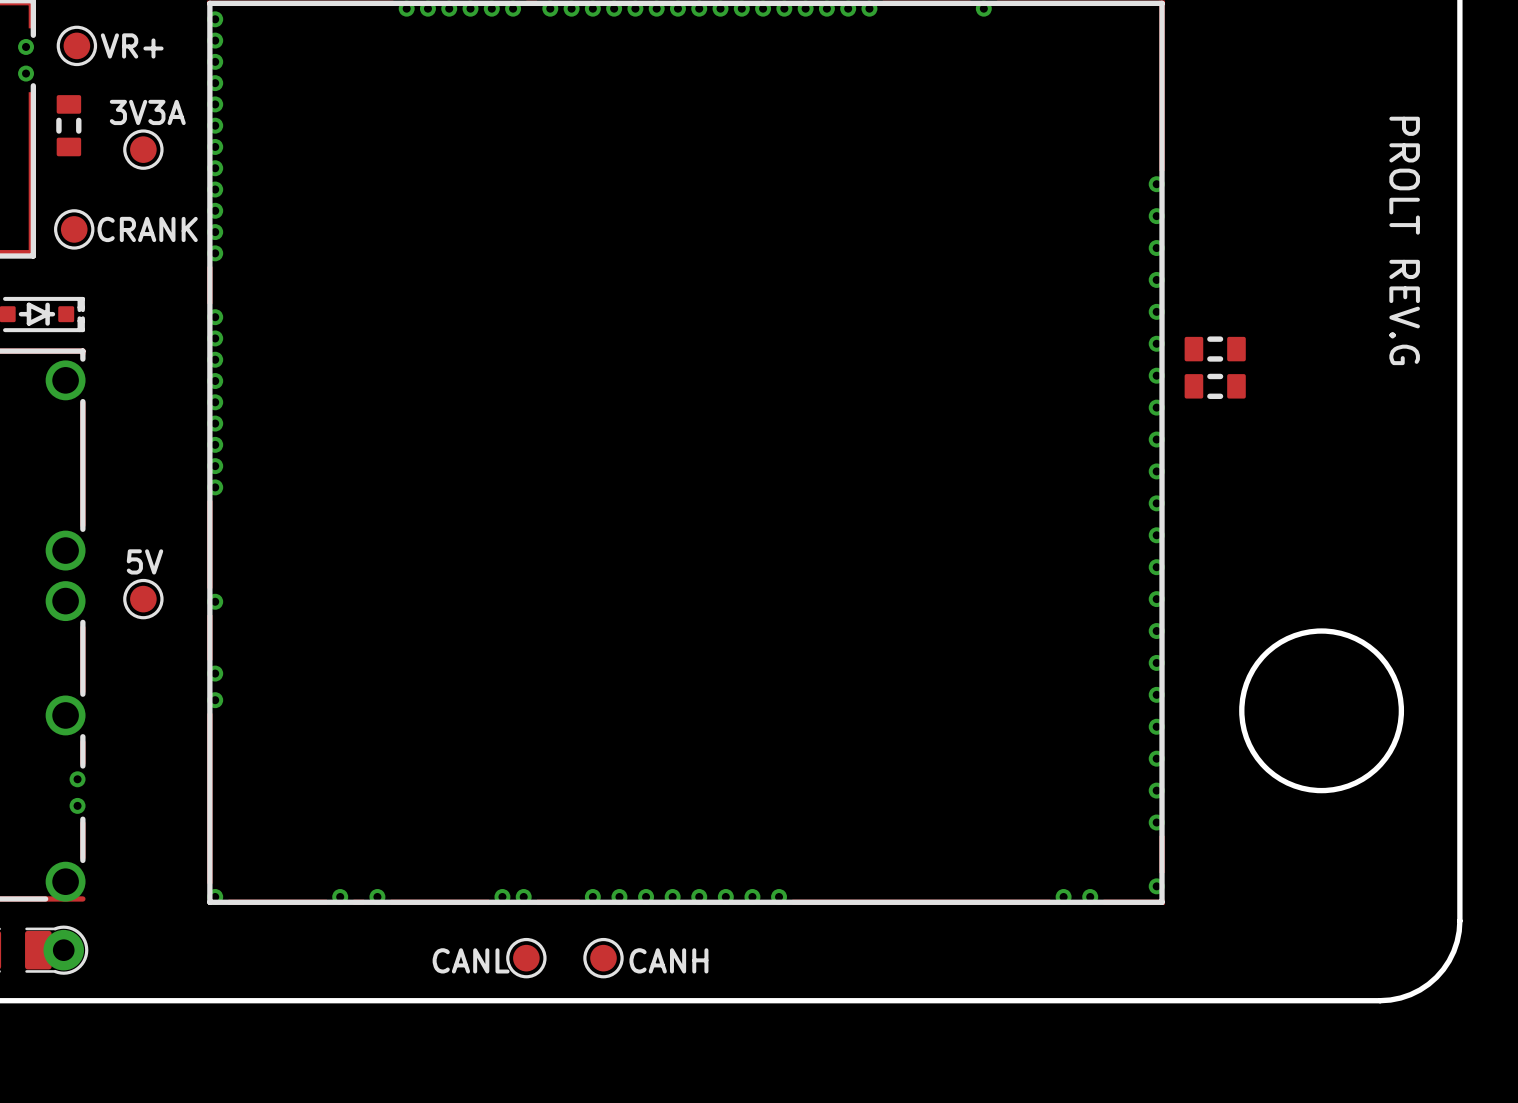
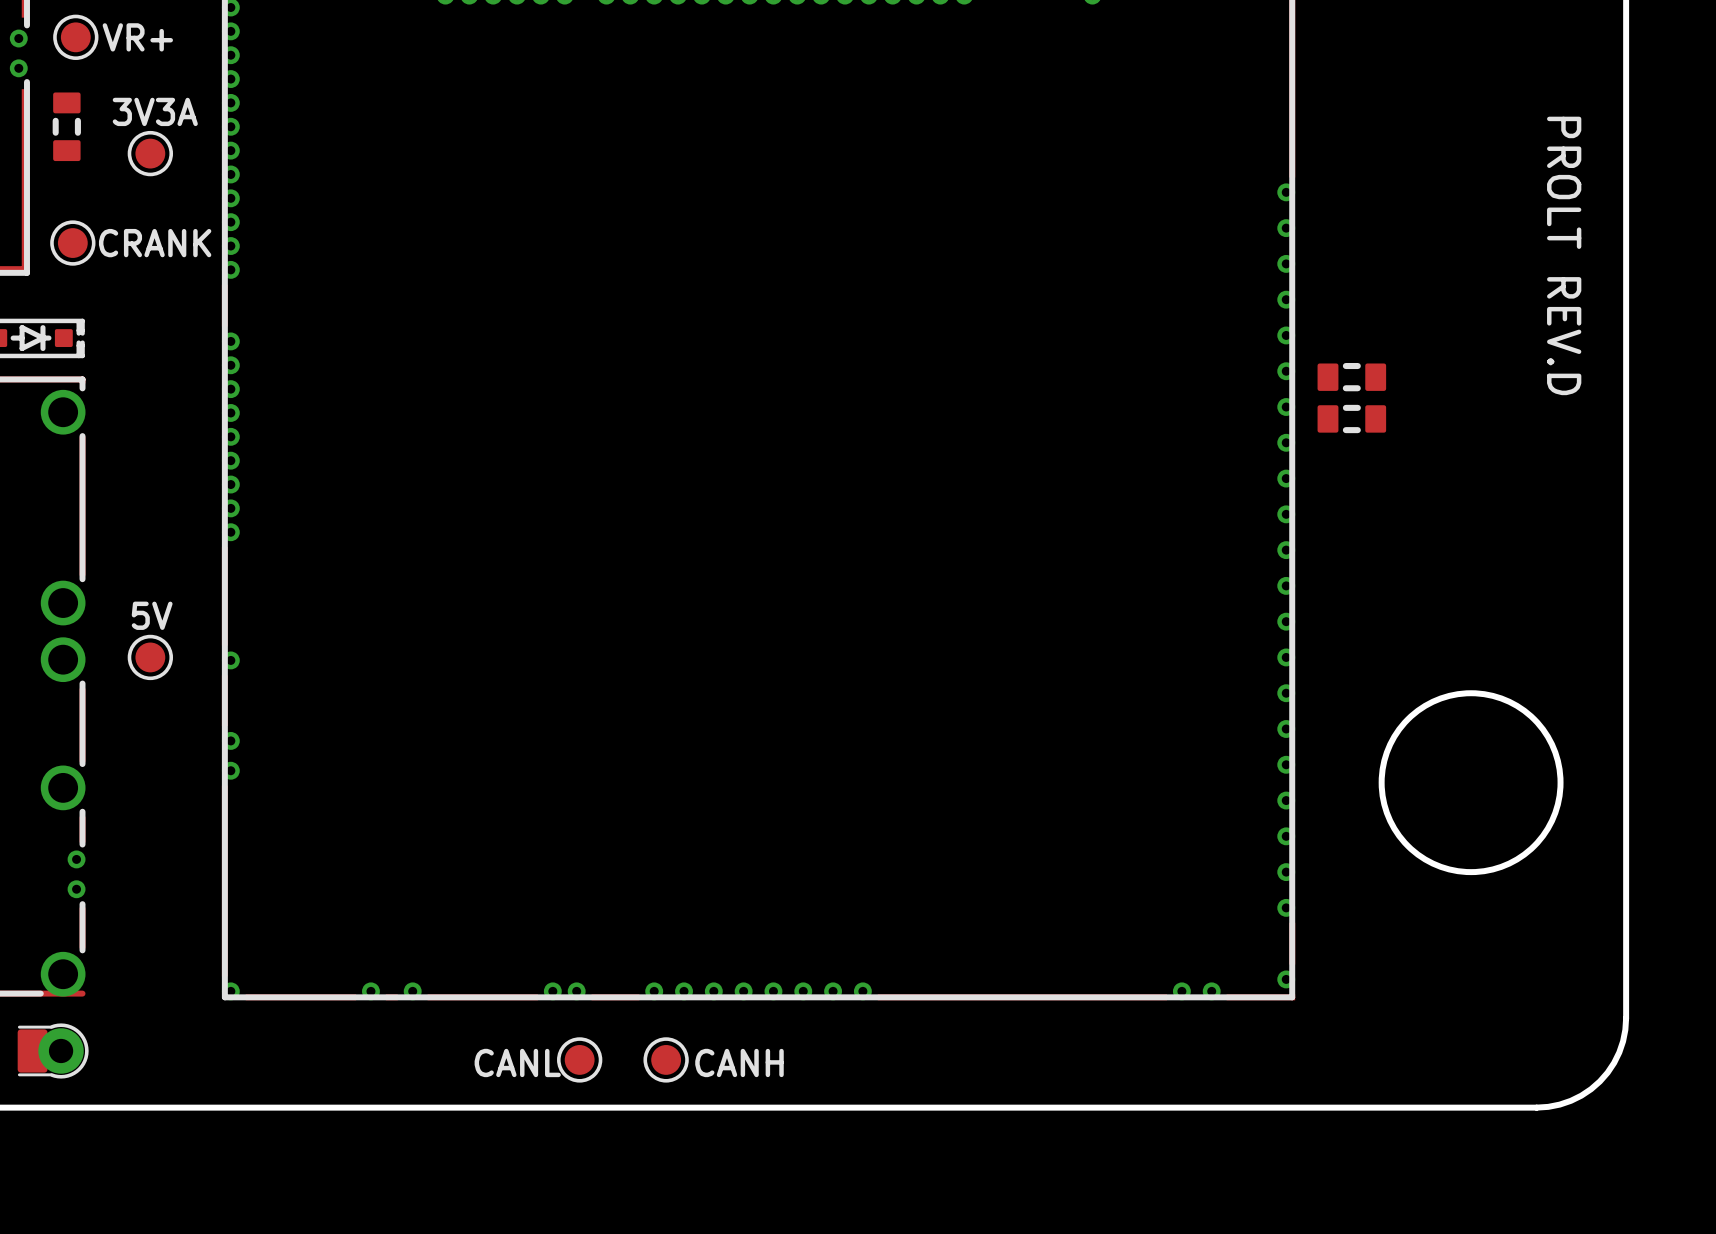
text: PROLT REV.G (1404, 240) -> PROLT REV.D (1564, 255)

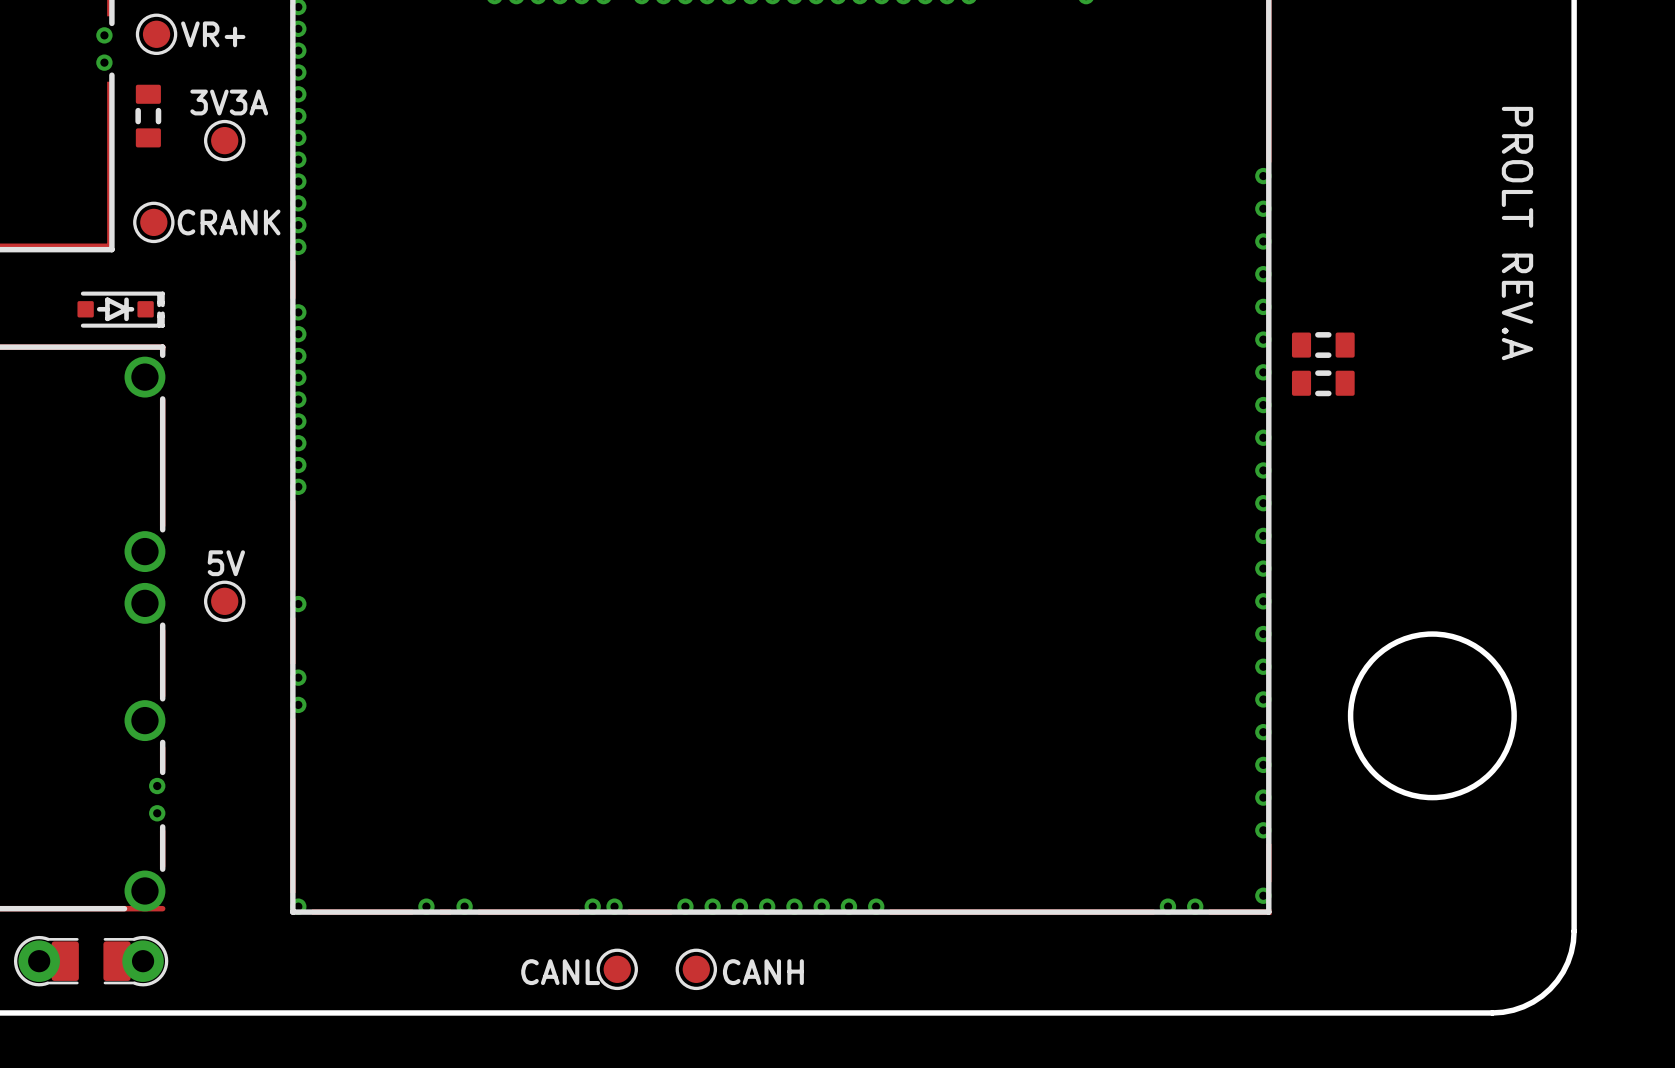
text: PROLT REV.D (1564, 255) -> PROLT REV.A (1517, 233)

